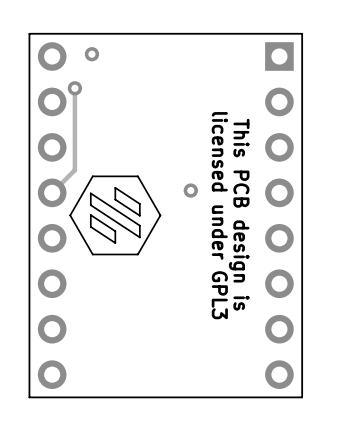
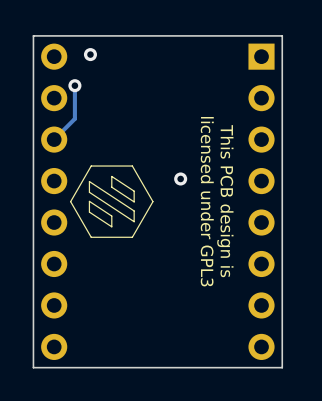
track: (74, 124) (74, 170) (58, 186) -> (74, 118) (54, 139)

